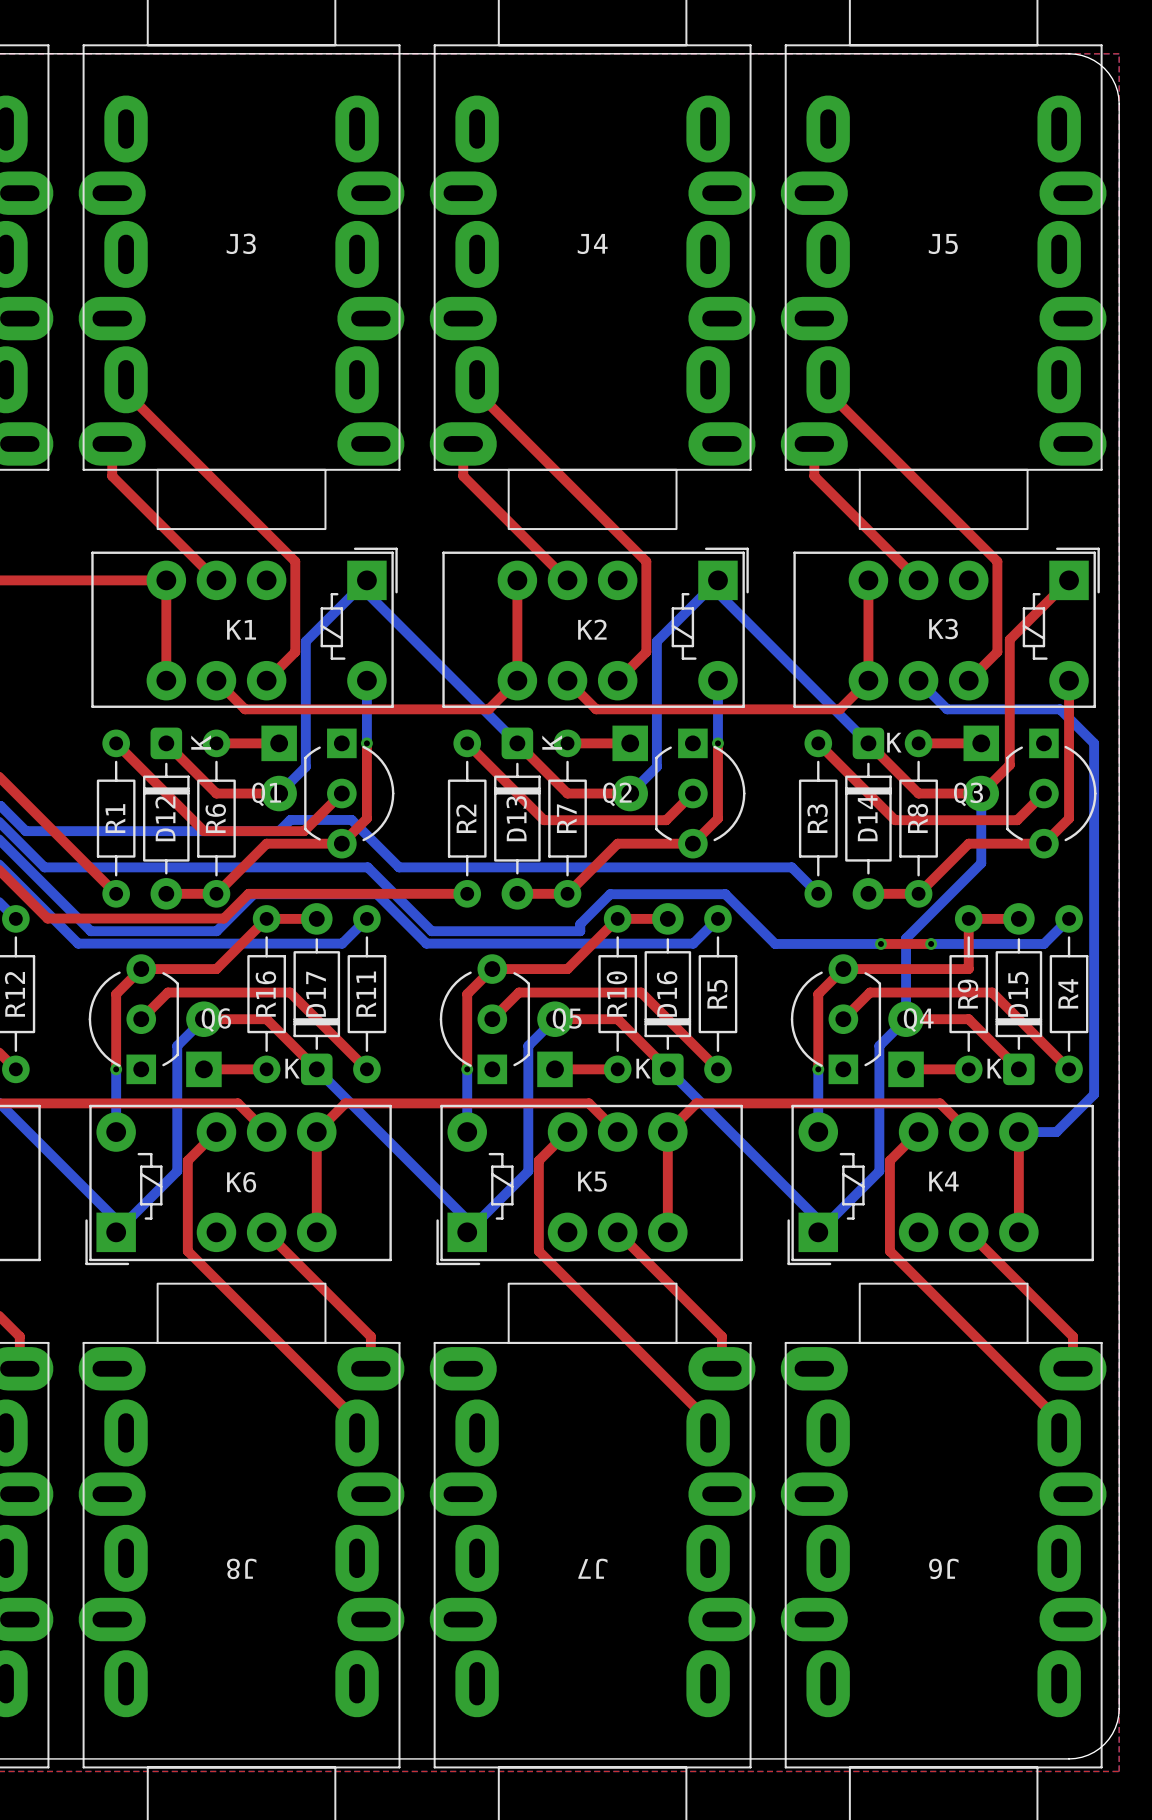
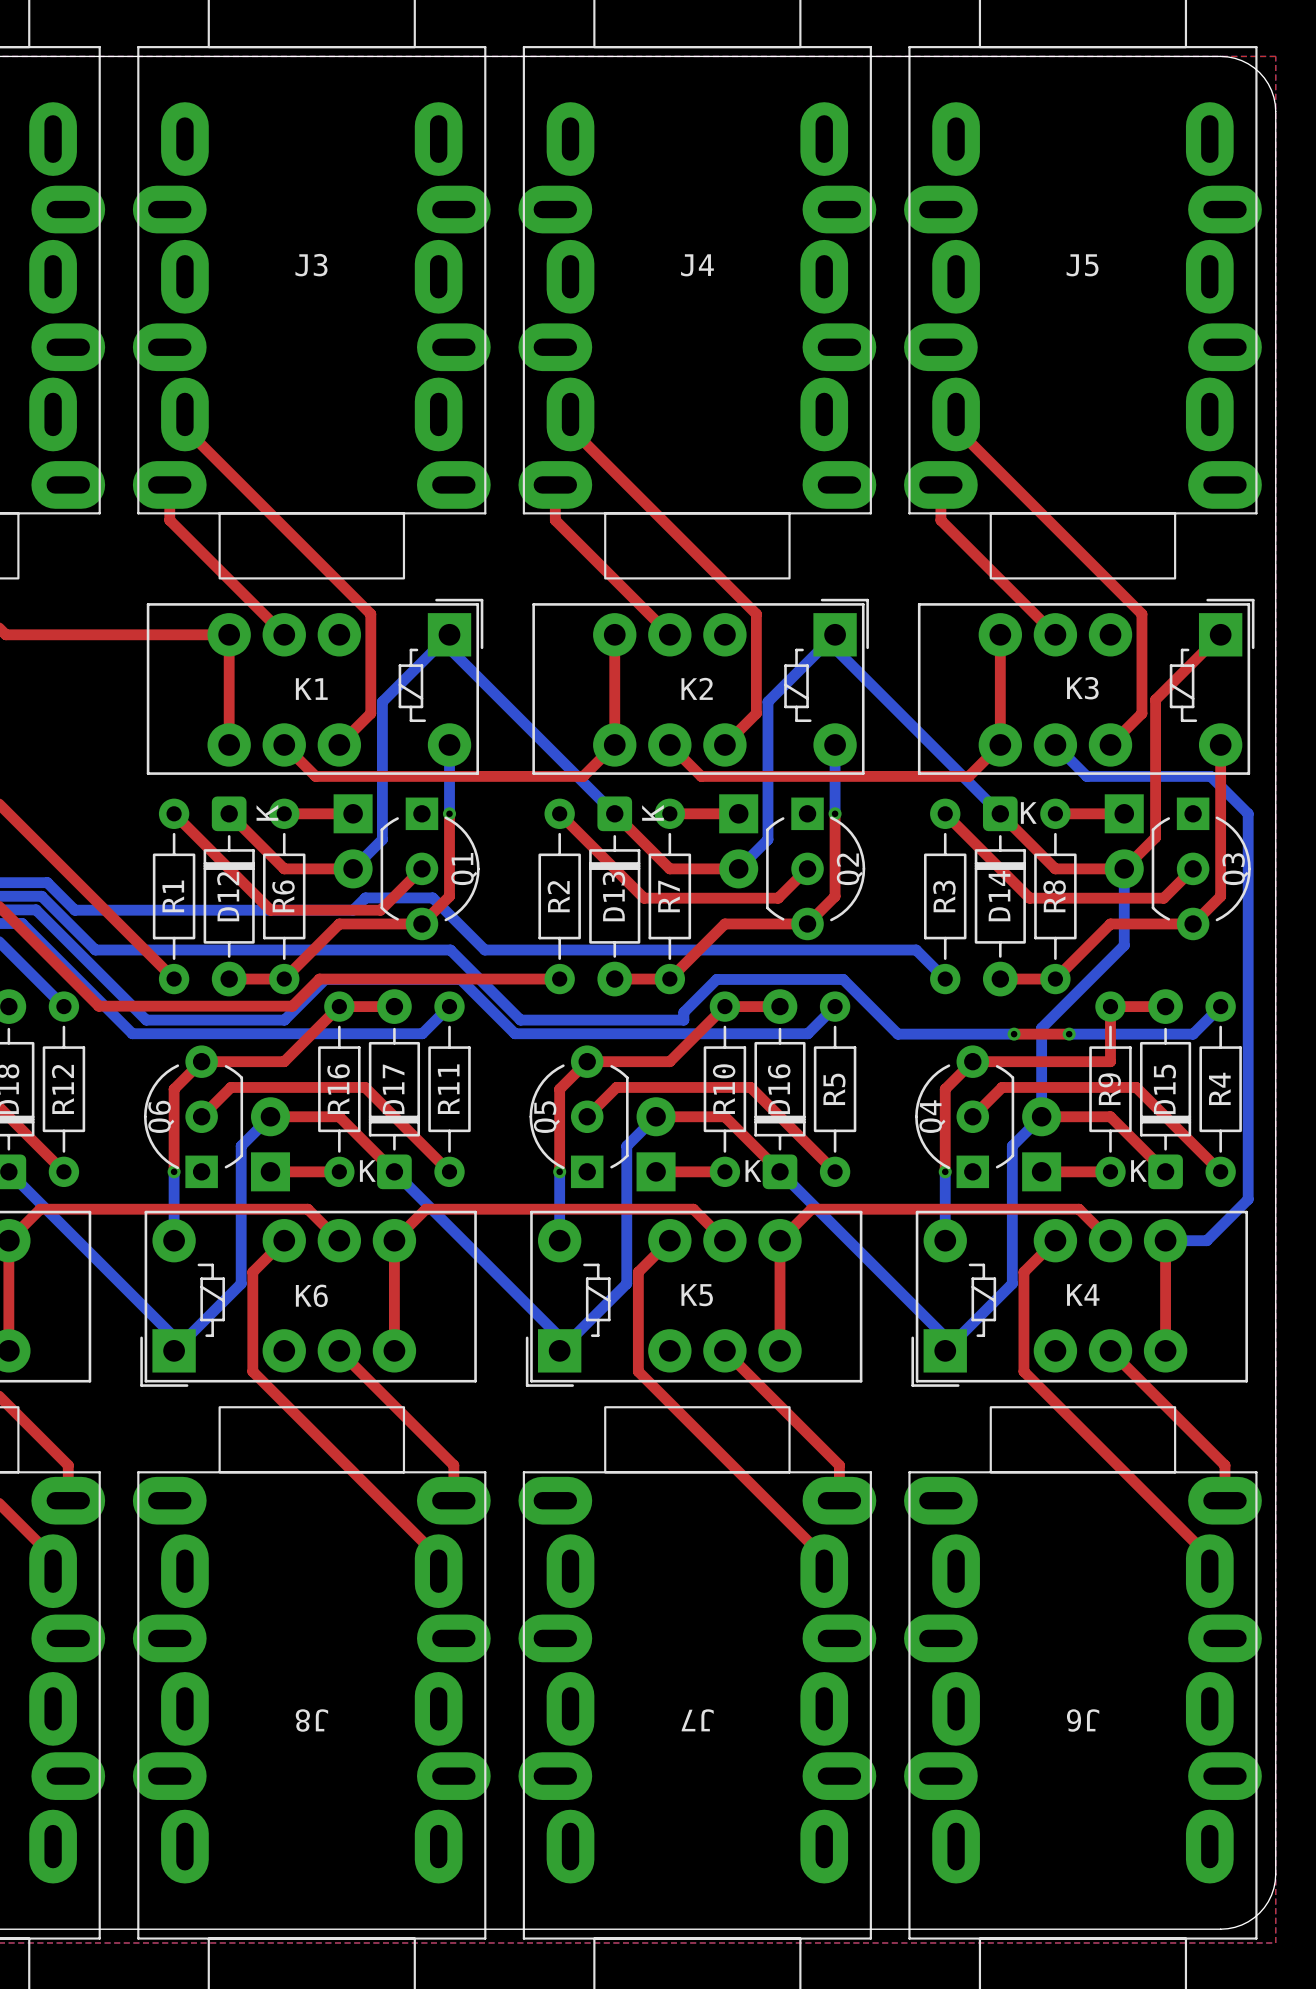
Q1 name rotation: 0° (266, 794) -> 90° counterclockwise (464, 869)
Q1 name position: Q1 (266, 794) -> Q1 (464, 869)
Q2 name rotation: 0° (617, 794) -> 90° counterclockwise (849, 869)
Q2 name position: Q2 (617, 794) -> Q2 (849, 869)
Q3 name rotation: 0° (968, 794) -> 90° counterclockwise (1235, 869)
Q3 name position: Q3 (968, 794) -> Q3 (1235, 869)
Q6 name rotation: 0° (216, 1020) -> 90° counterclockwise (161, 1116)
Q6 name position: Q6 (216, 1020) -> Q6 (161, 1116)
Q5 name rotation: 0° (567, 1020) -> 90° counterclockwise (546, 1117)
Q5 name position: Q5 (567, 1020) -> Q5 (546, 1117)
Q4 name rotation: 0° (918, 1020) -> 90° counterclockwise (932, 1116)
Q4 name position: Q4 (918, 1020) -> Q4 (932, 1116)

